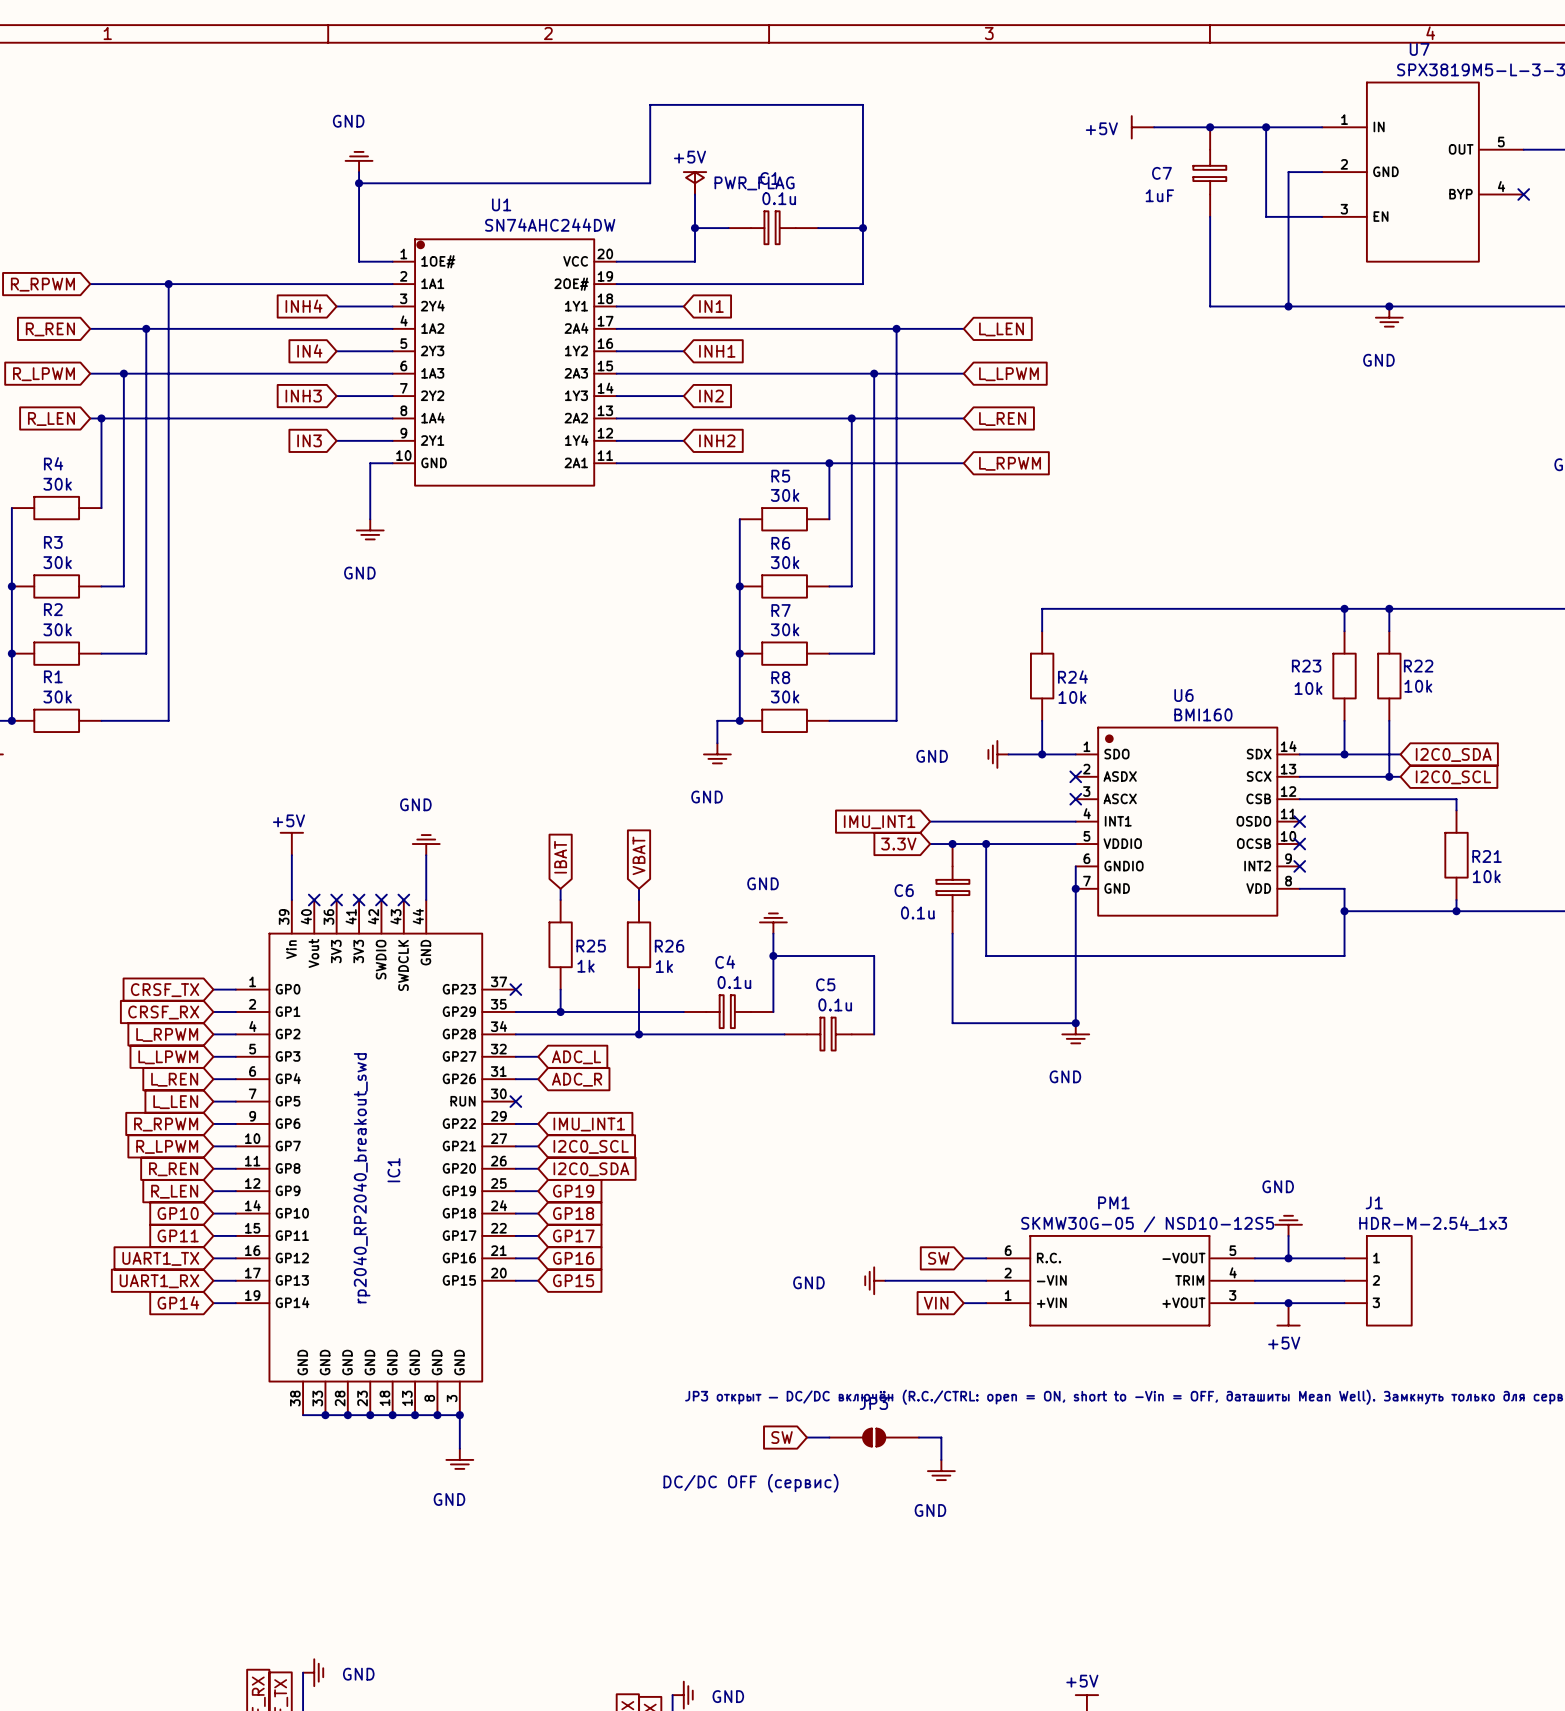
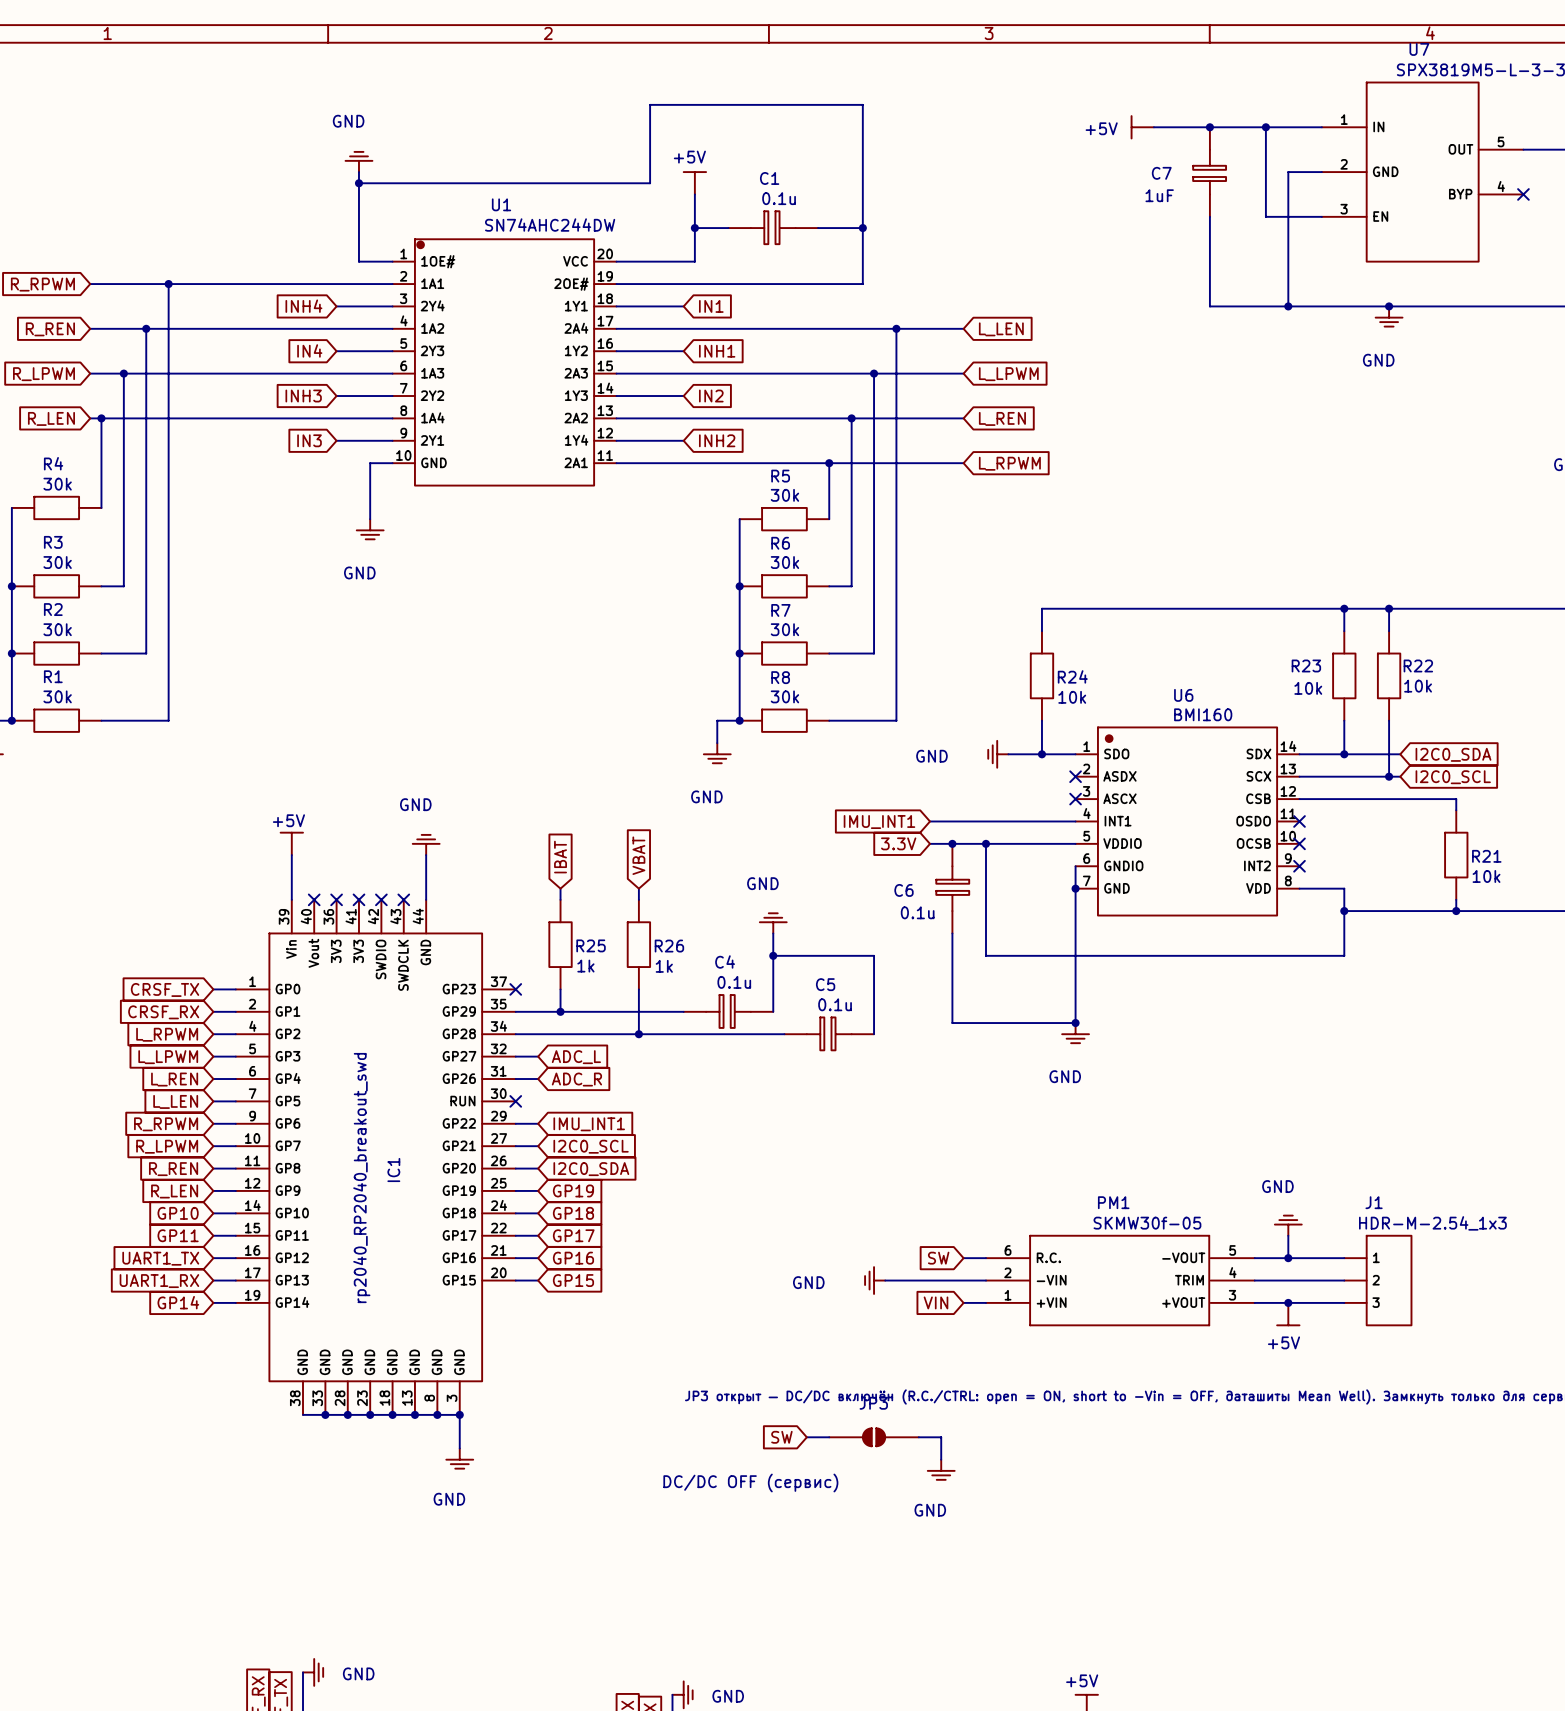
power symbol: PWR_FLAG (695, 183) -> none
PM1 value: SKMW30G-05 / NSD10-12S5 (1147, 1224) -> SKMW30f-05 (1147, 1223)

